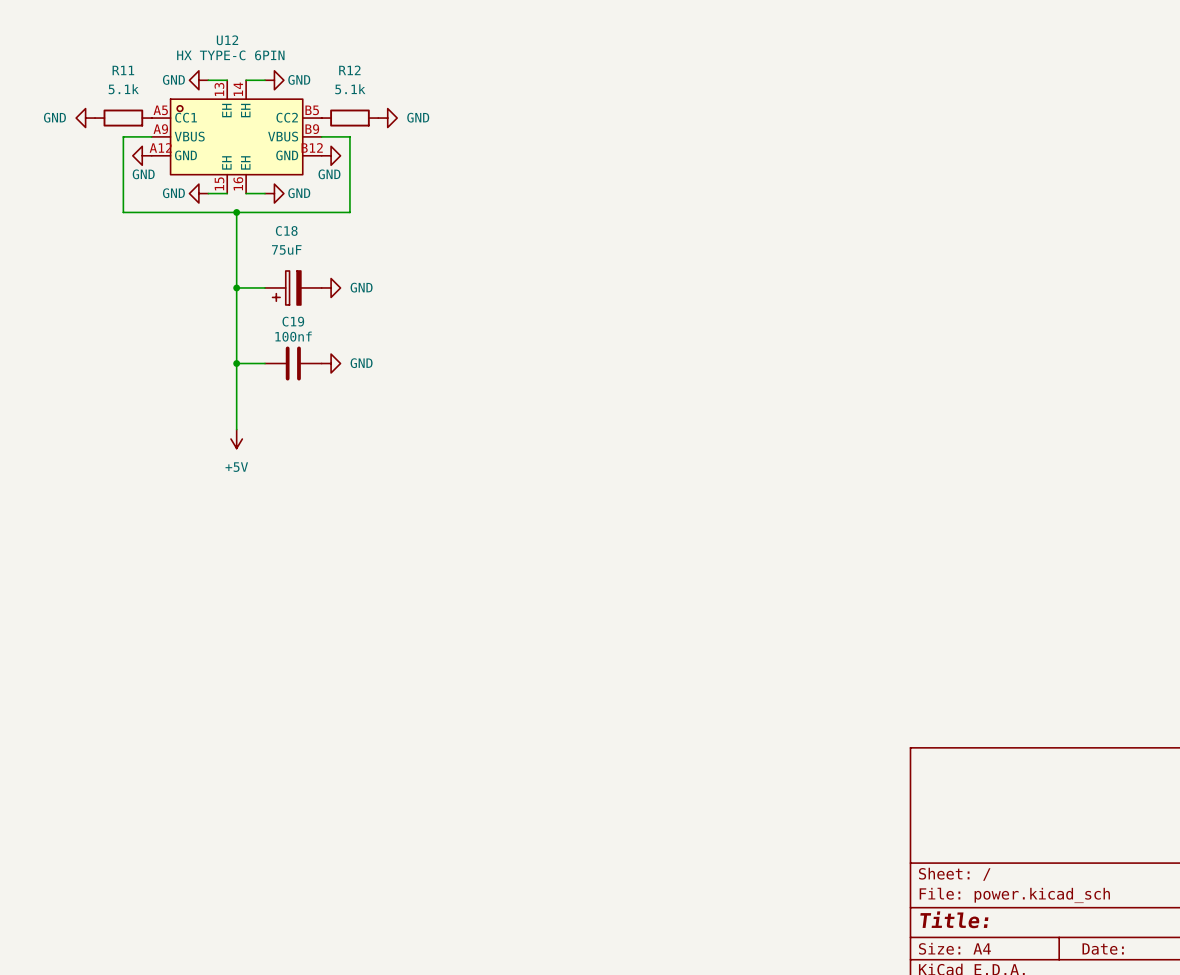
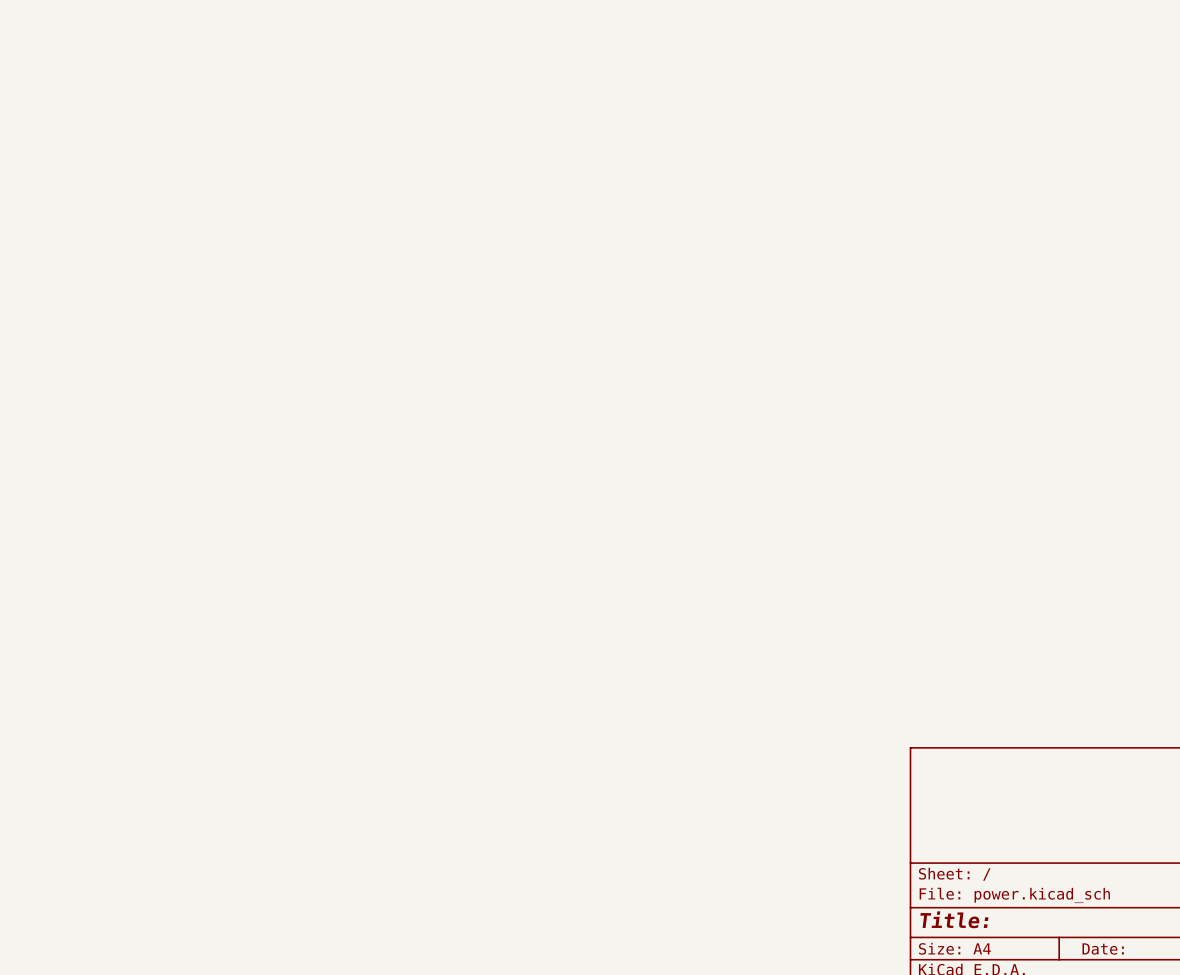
power symbol: GND (198, 80) -> none
wire: (208, 80) (227, 80) -> none
wire: (246, 80) (264, 80) -> none
power symbol: GND (274, 80) -> none
power symbol: GND (85, 118) -> none
R11: 5.1k (123, 118) -> none
R12: 5.1k (349, 118) -> none
power symbol: GND (387, 118) -> none
wire: (151, 136) (123, 136) (123, 212) (349, 212) (349, 136) (321, 136) -> none
U12: HX TYPE-C 6PIN (236, 136) -> none
power symbol: GND (142, 155) -> none
power symbol: GND (331, 155) -> none
power symbol: GND (198, 193) -> none
wire: (208, 193) (227, 193) -> none
wire: (246, 193) (264, 193) -> none
power symbol: GND (274, 193) -> none
wire: (236, 212) (236, 429) -> none
junction: (236, 212) -> none
wire: (236, 287) (264, 287) -> none
junction: (236, 287) -> none
C18: 75uF (293, 287) -> none
power symbol: GND (331, 287) -> none
wire: (236, 363) (264, 363) -> none
junction: (236, 363) -> none
C19: 100nf (293, 363) -> none
power symbol: GND (331, 363) -> none
power symbol: +5V (236, 439) -> none

